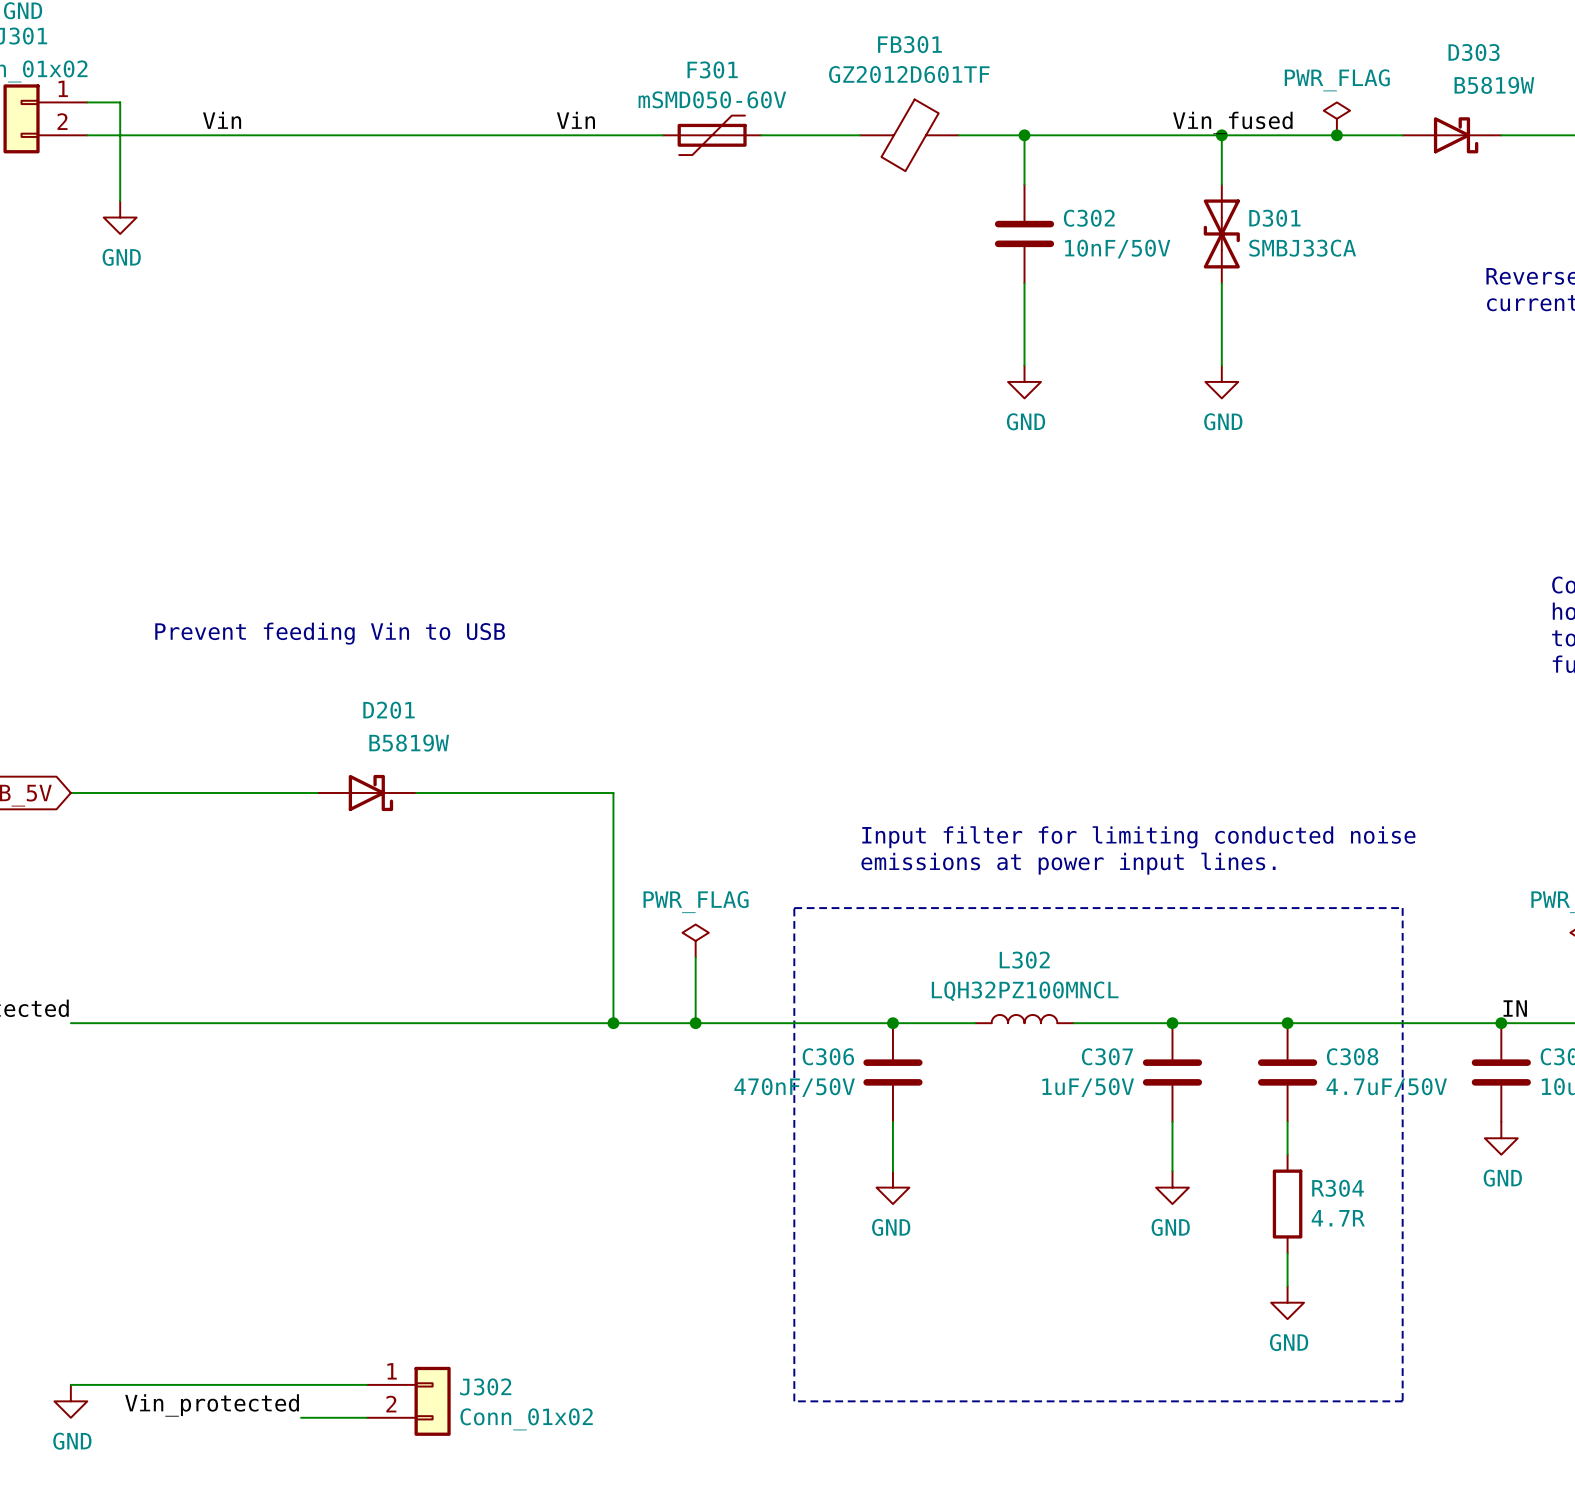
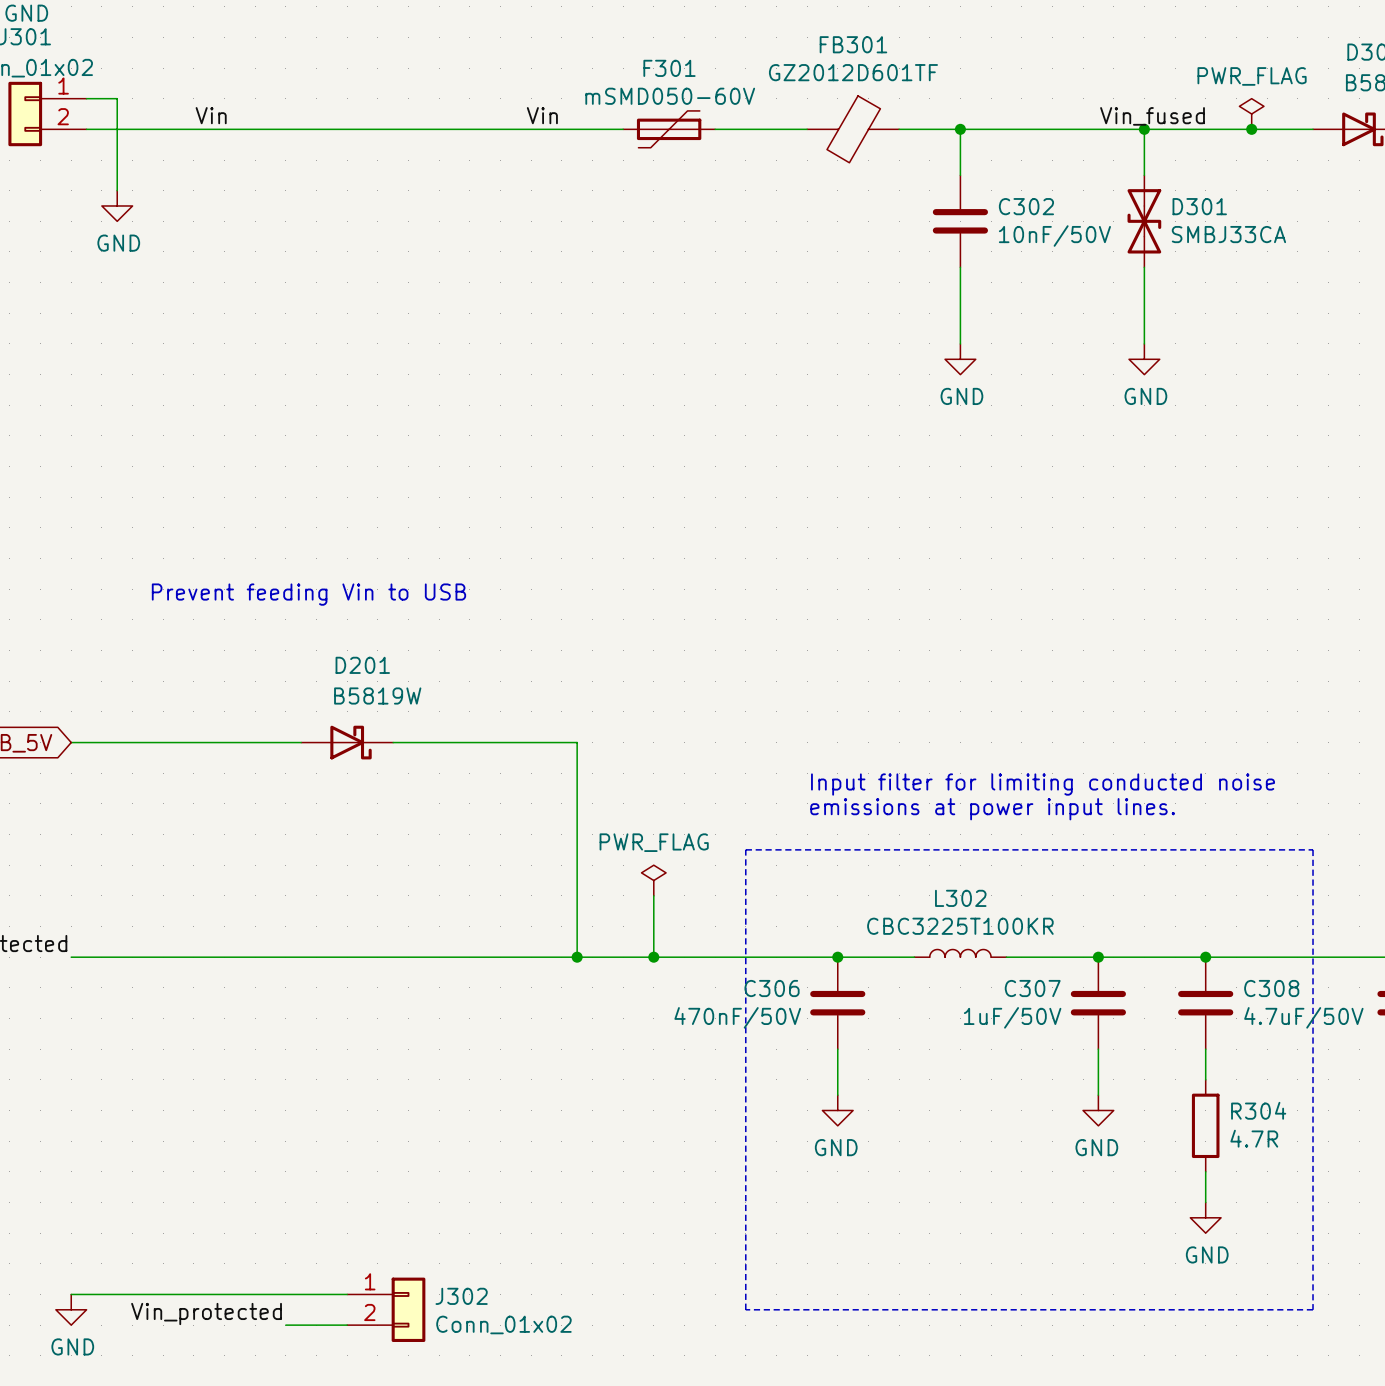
L302 value: LQH32PZ100MNCL (1025, 991) -> CBC3225T100KR (960, 926)

